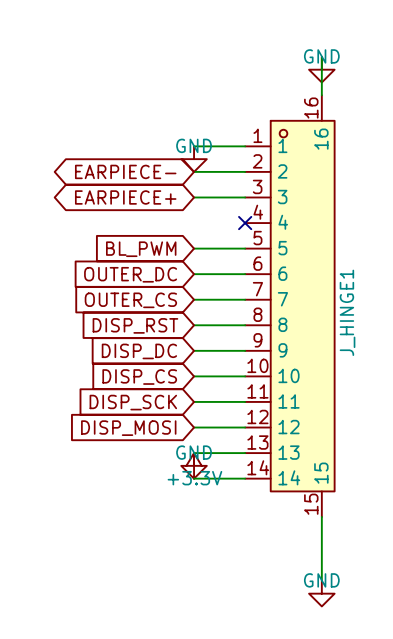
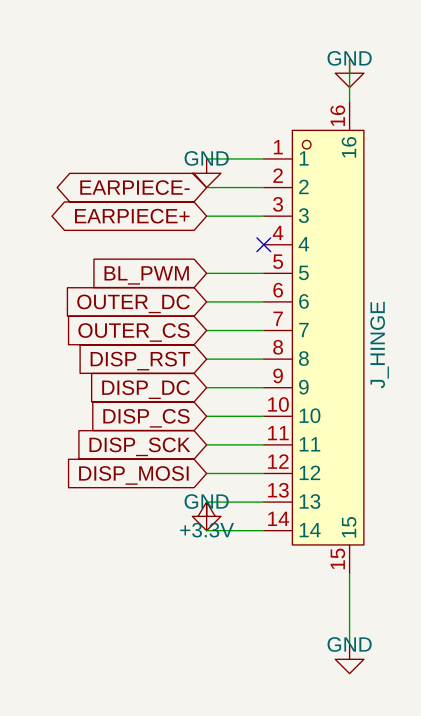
J_HINGE1 name: J_HINGE1 (347, 312) -> J_HINGE (379, 345)

